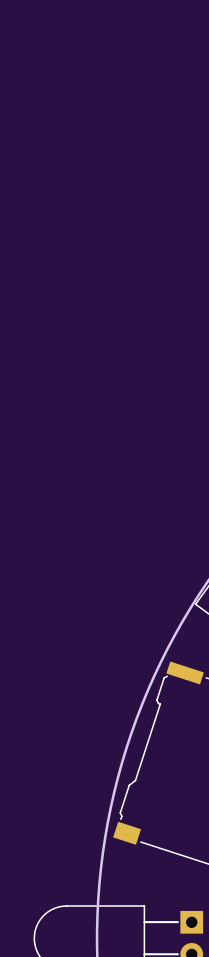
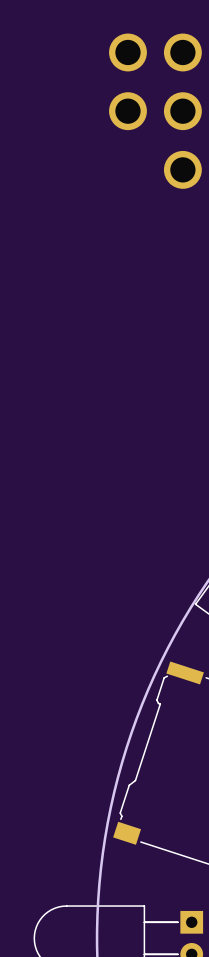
part: none -> (127, 52)
part: none -> (182, 52)
part: none -> (127, 111)
part: none -> (182, 111)
part: none -> (182, 169)

